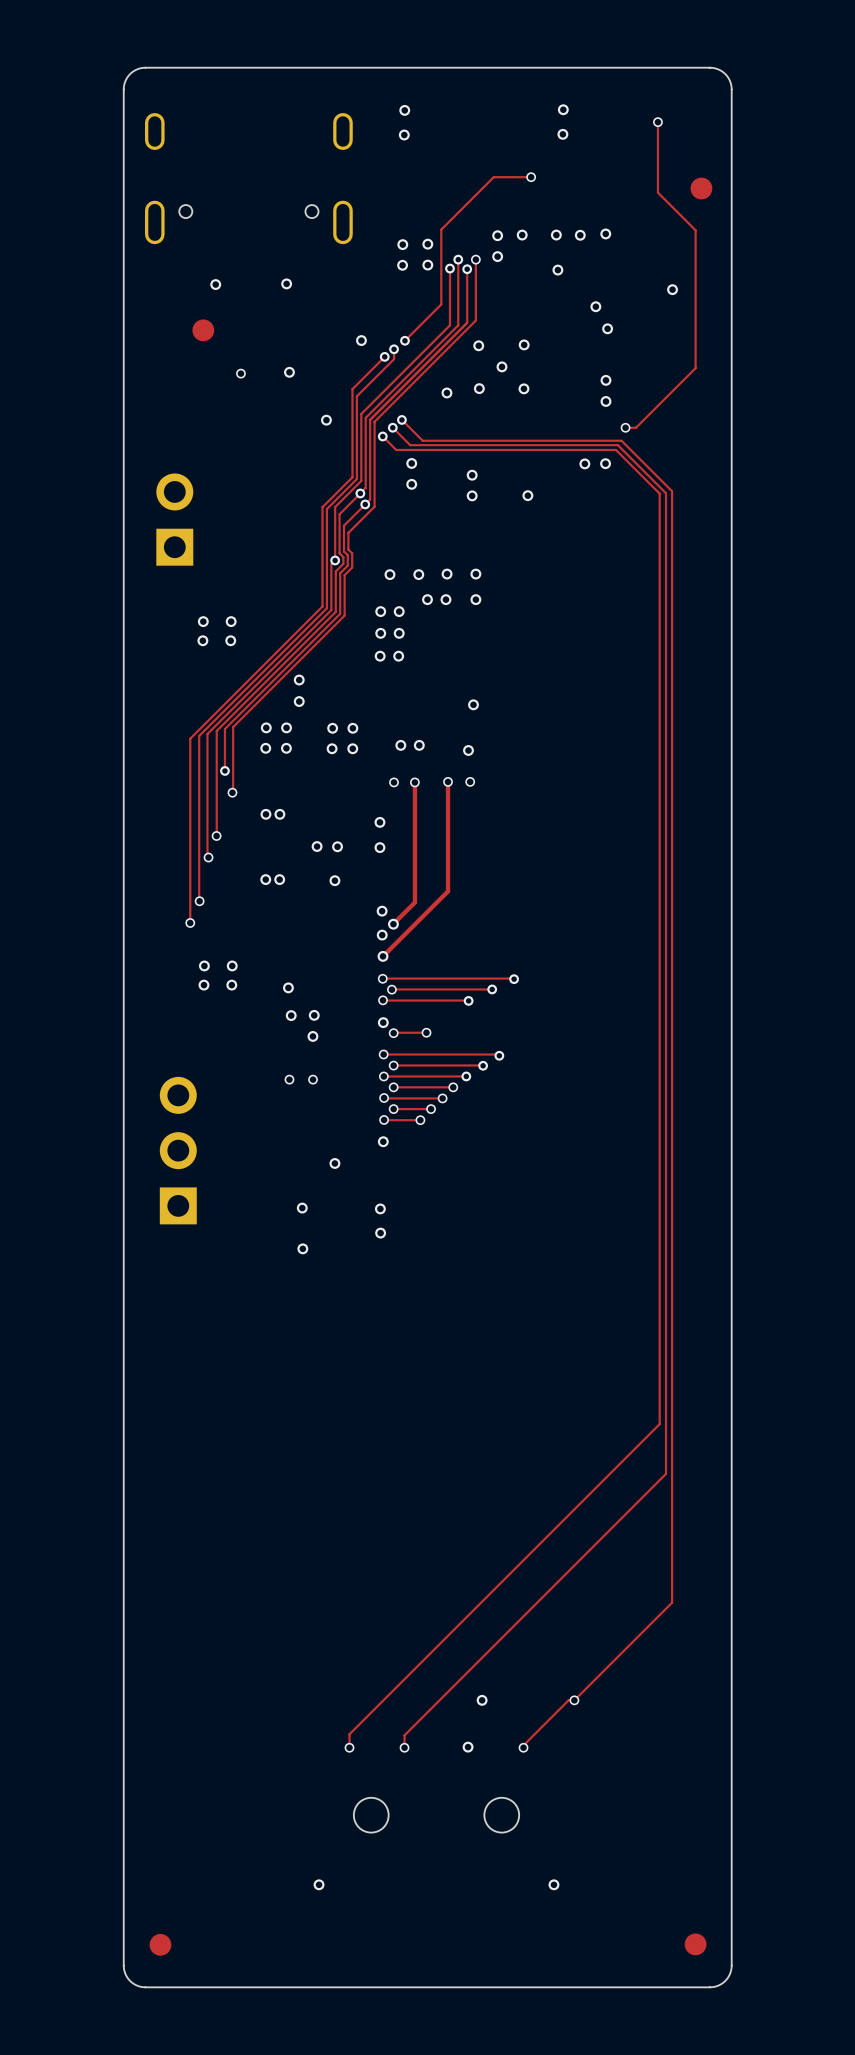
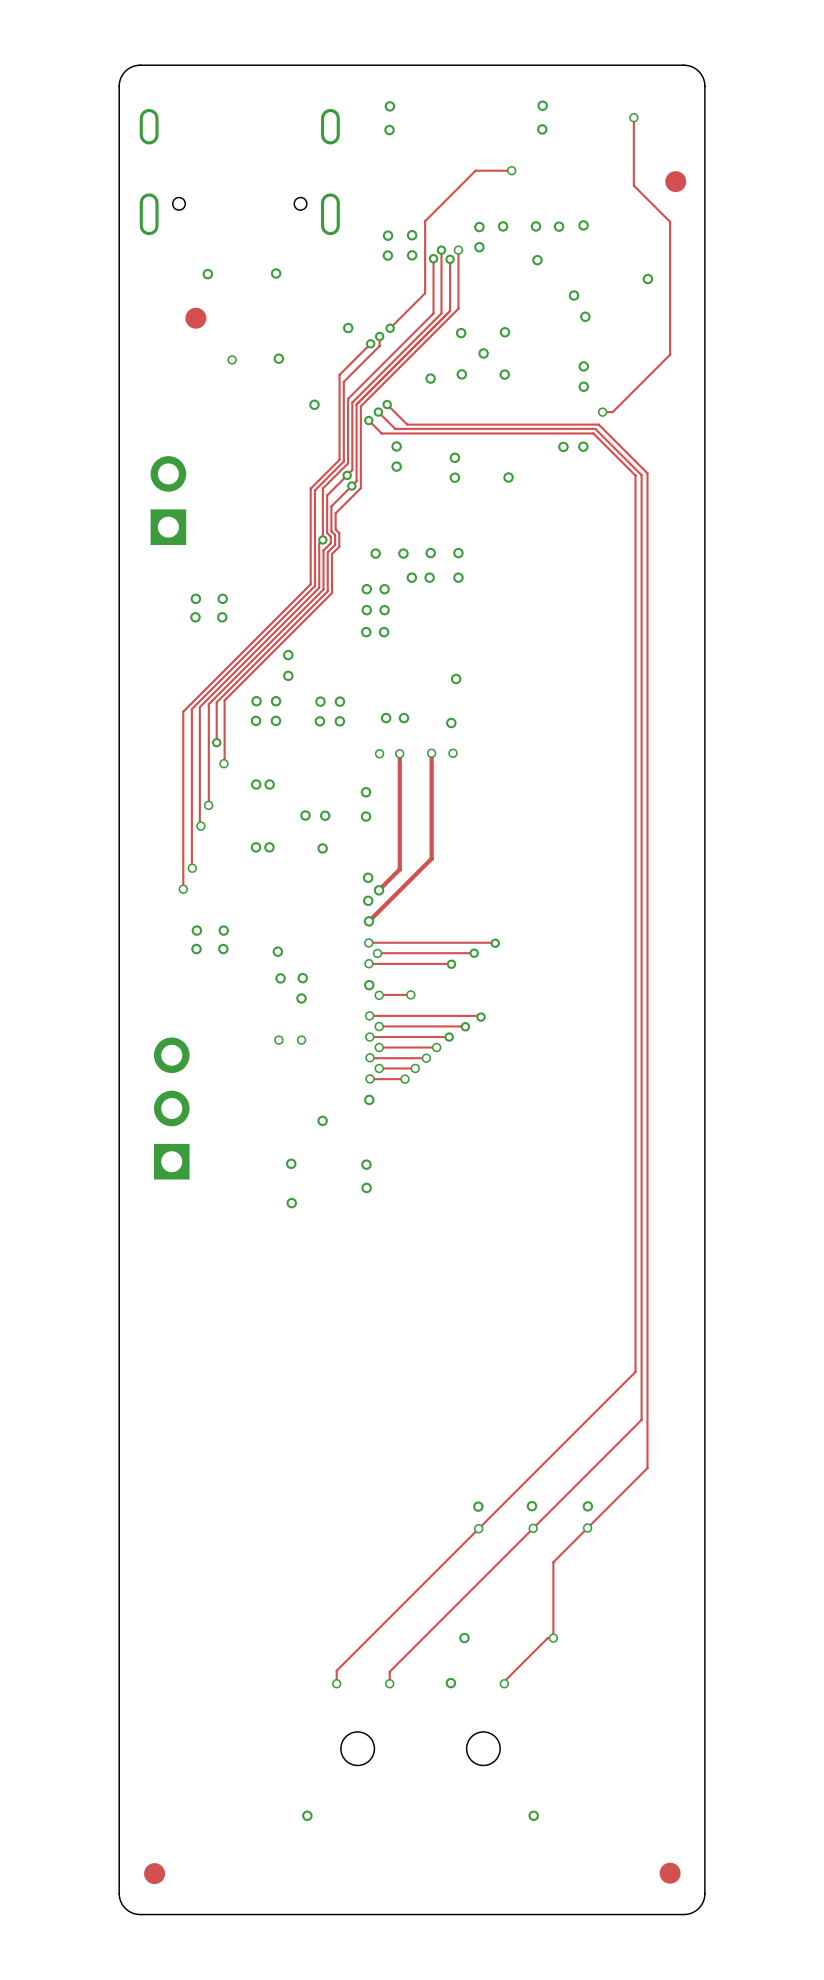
track: (672, 1523) (672, 1602) (574, 1700) -> (647, 1468) (553, 1562) (553, 1638)
via: none -> (478, 1506)
via: none -> (531, 1506)
via: none -> (587, 1506)
via: none -> (478, 1528)
via: none -> (533, 1528)
via: none -> (587, 1527)

